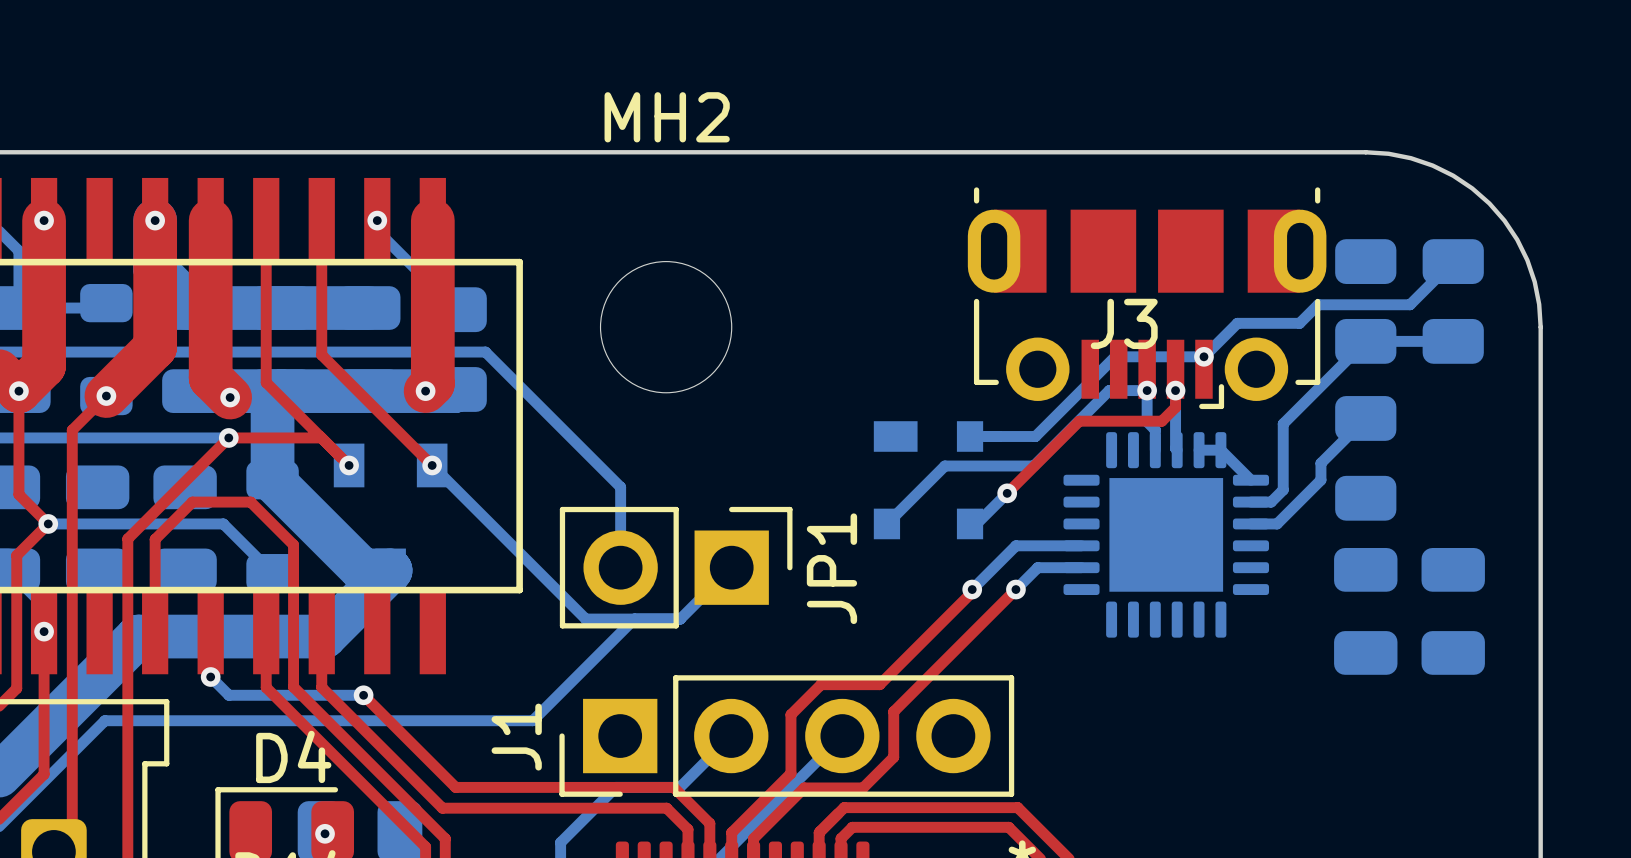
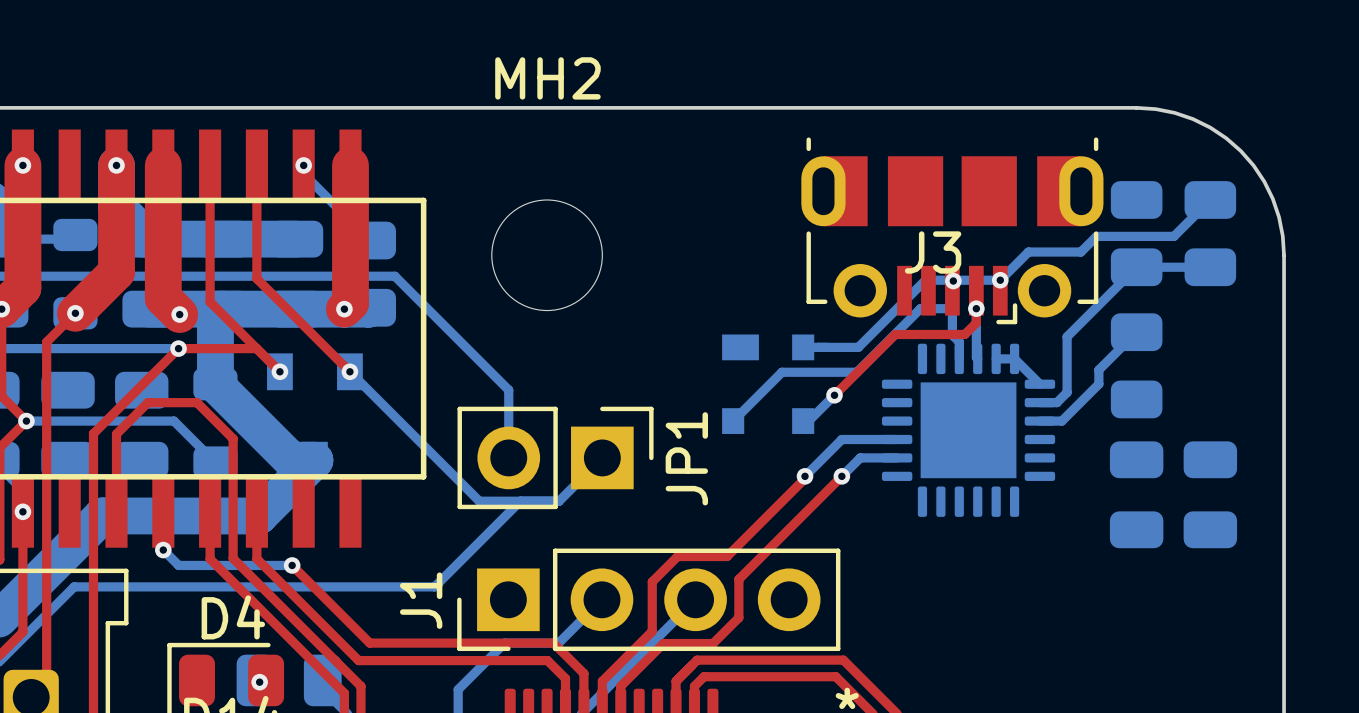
via position: (1147, 390) -> (953, 281)

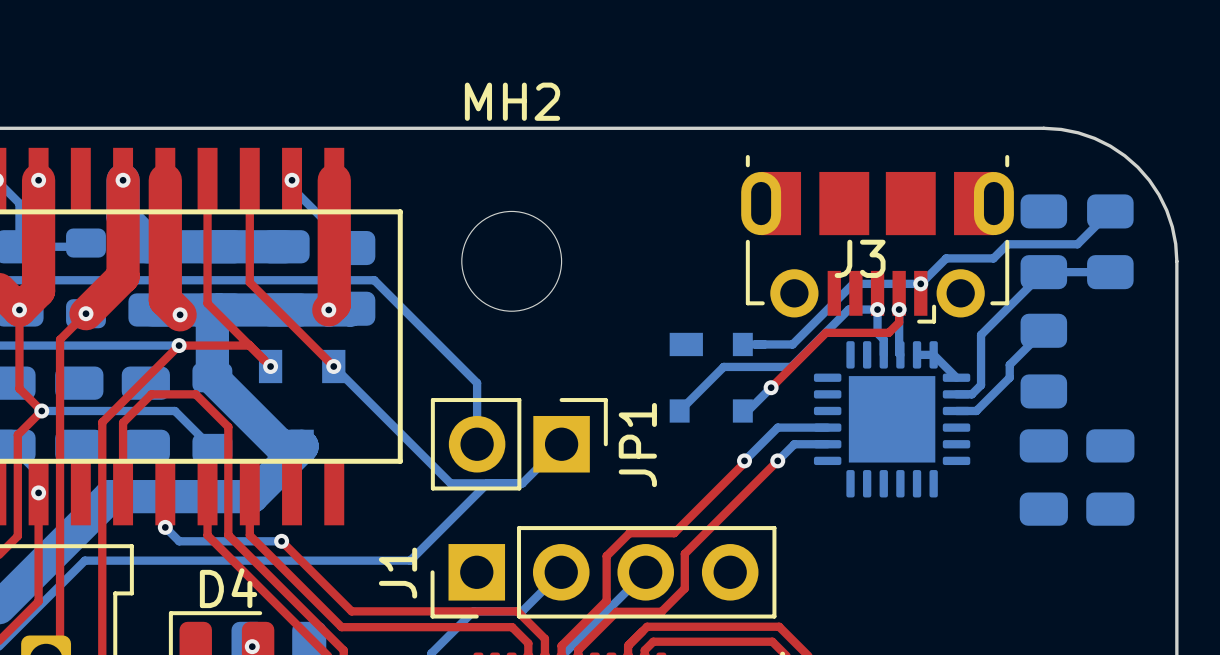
via position: (953, 281) -> (877, 309)

